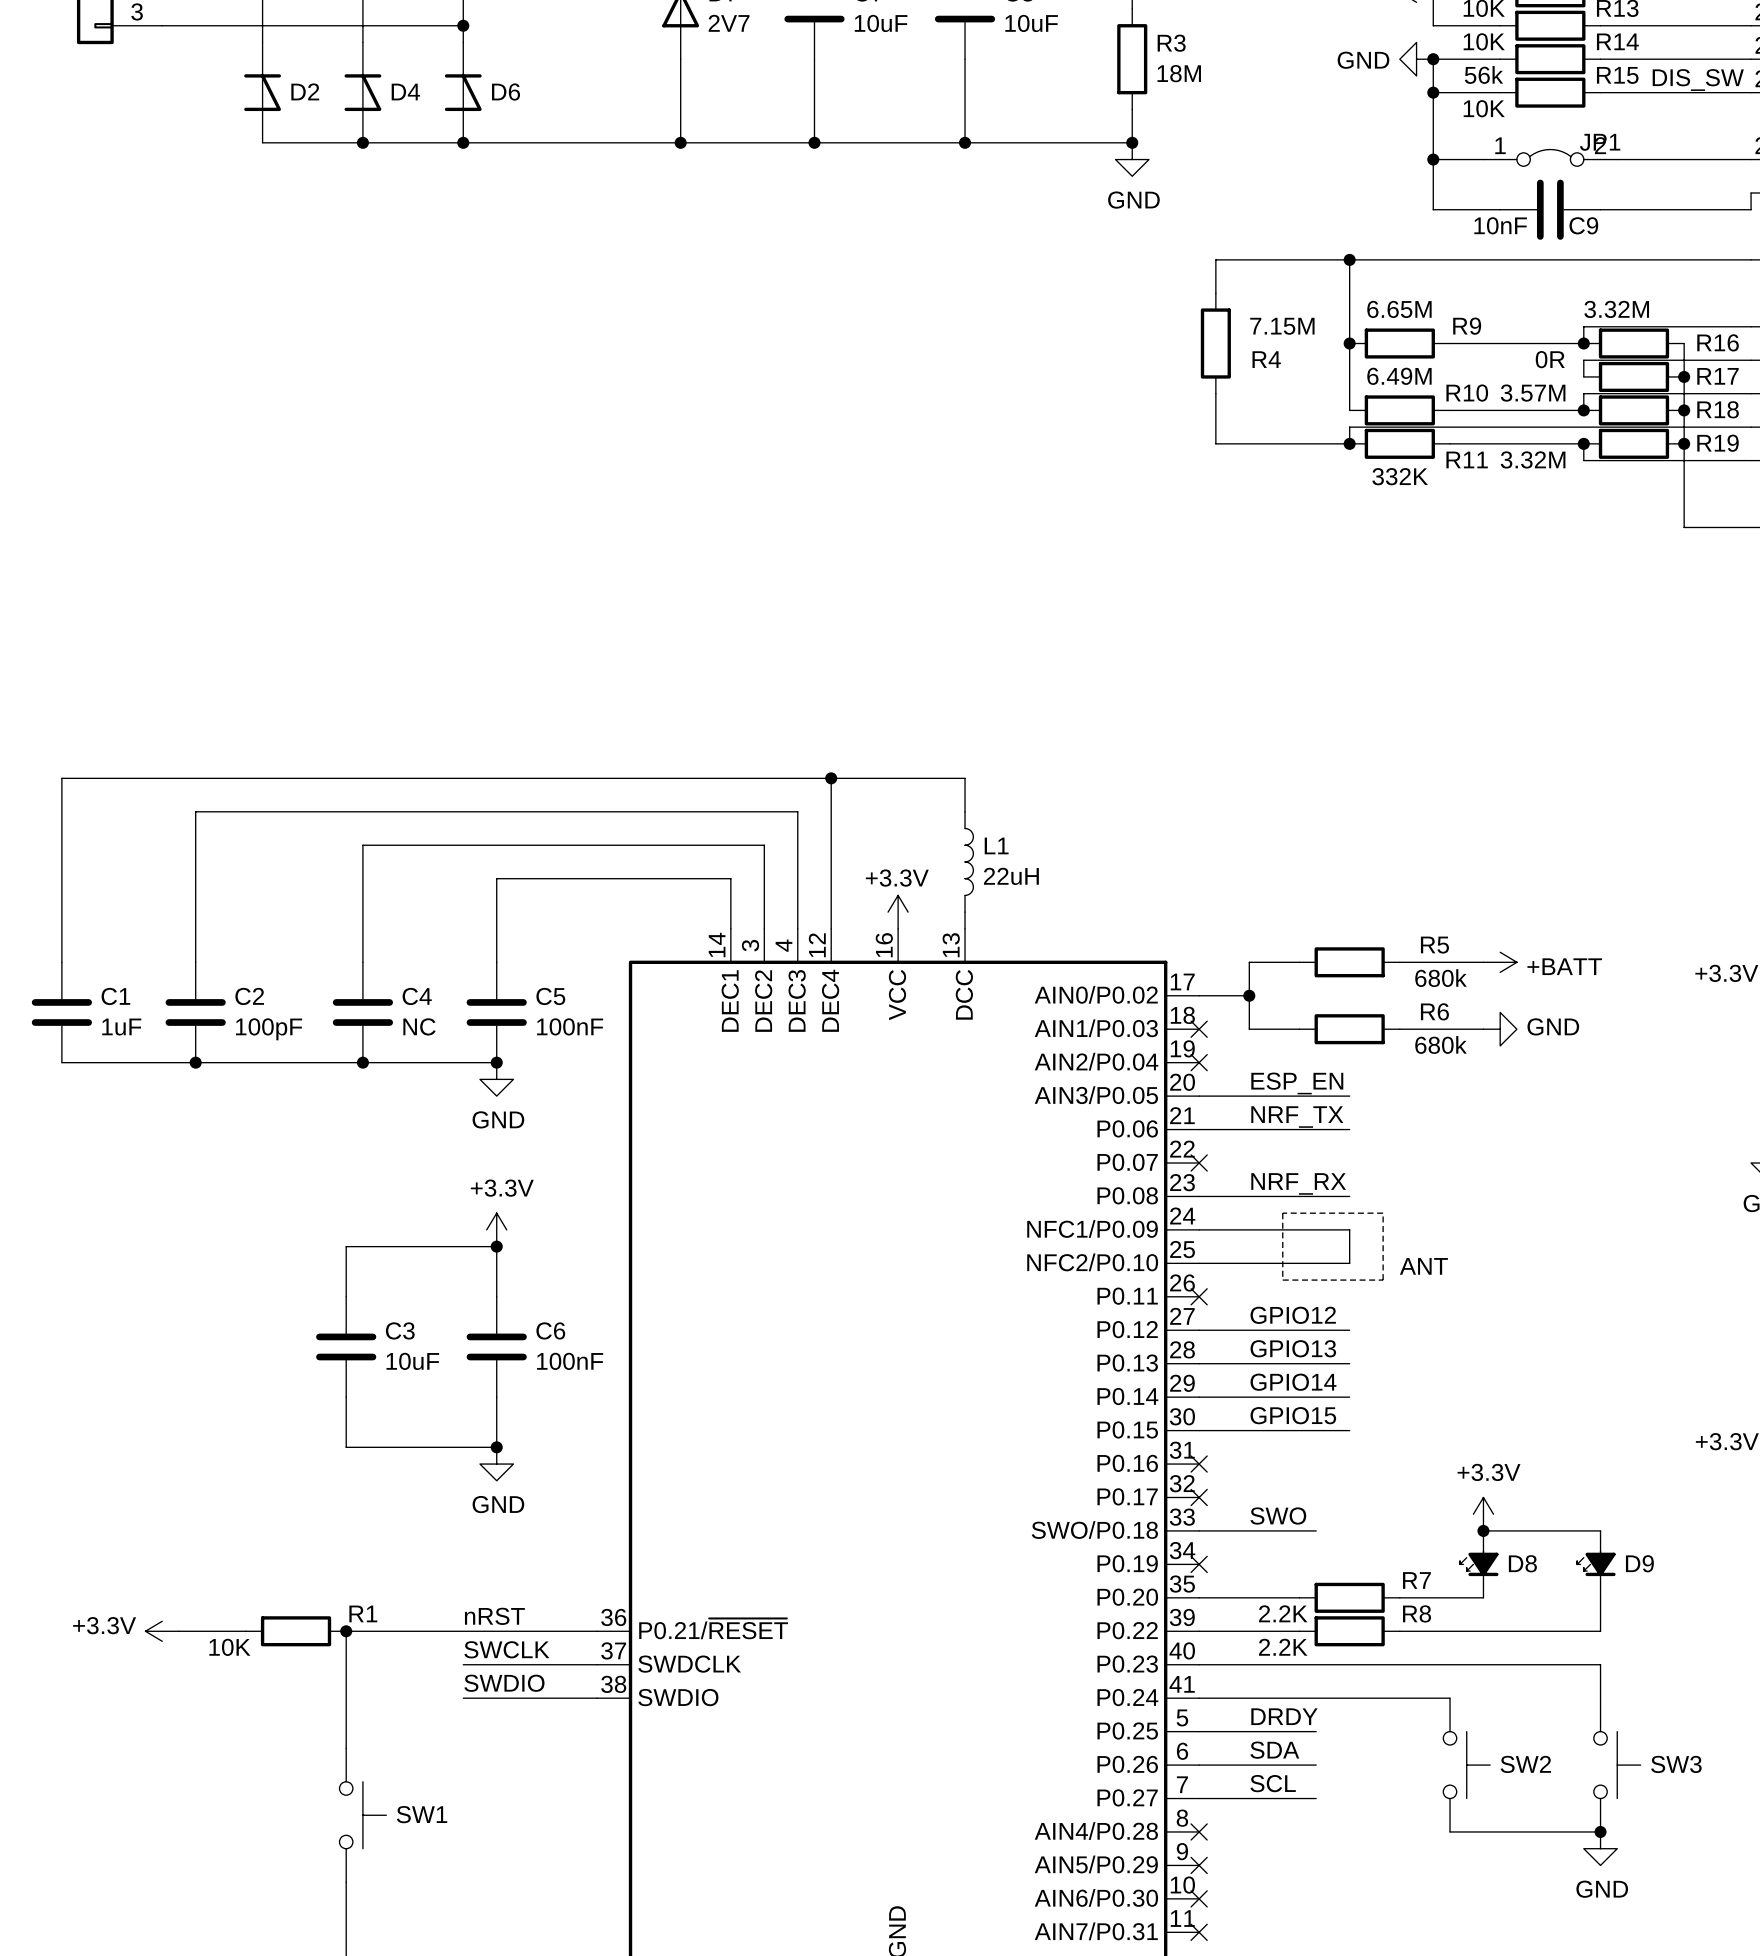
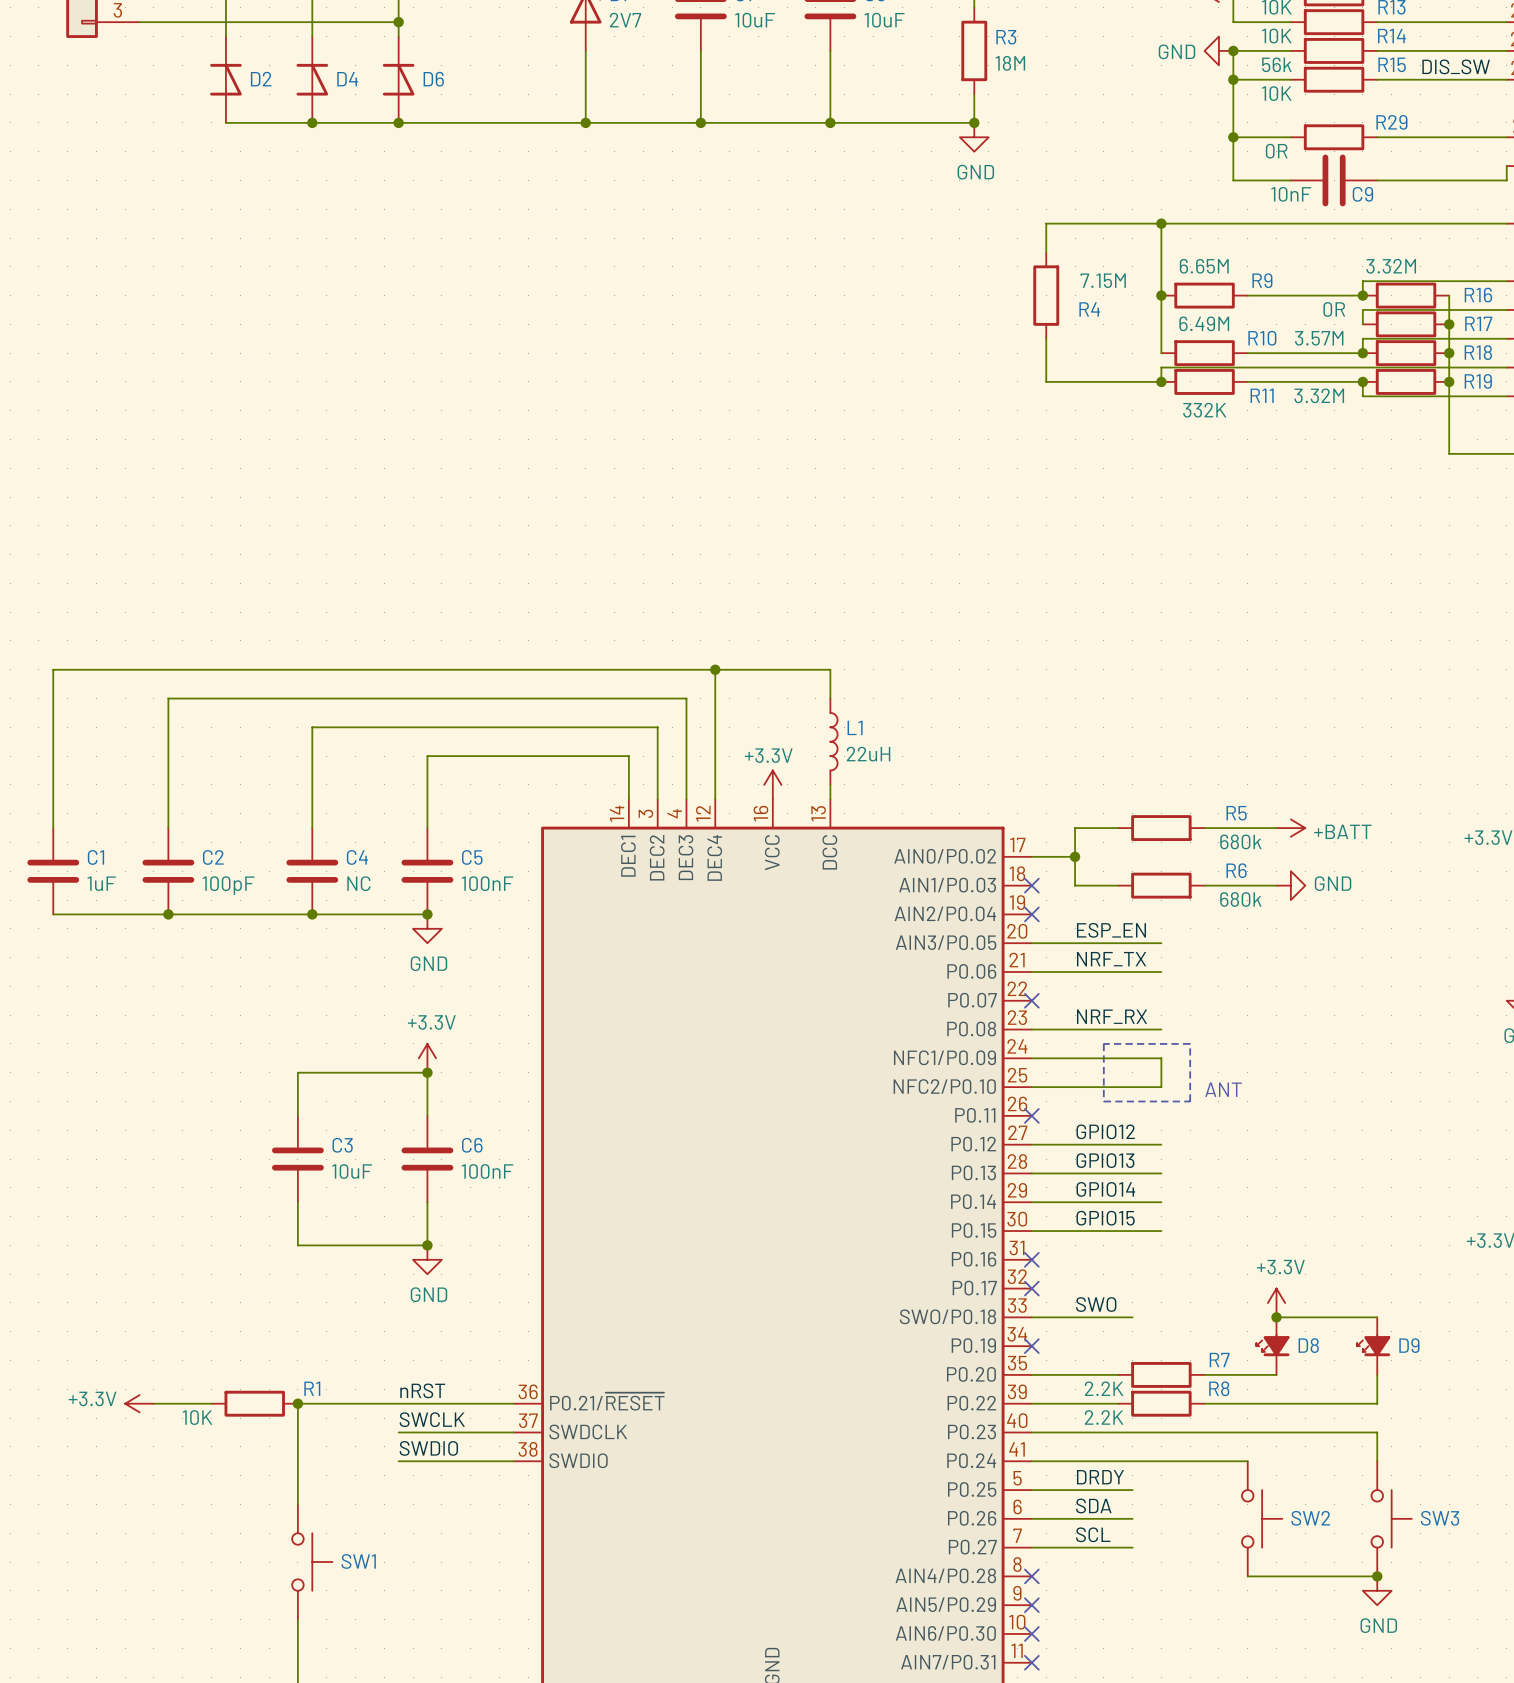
JP1: (1550, 157) -> none
R29: none -> 0R (1334, 137)

